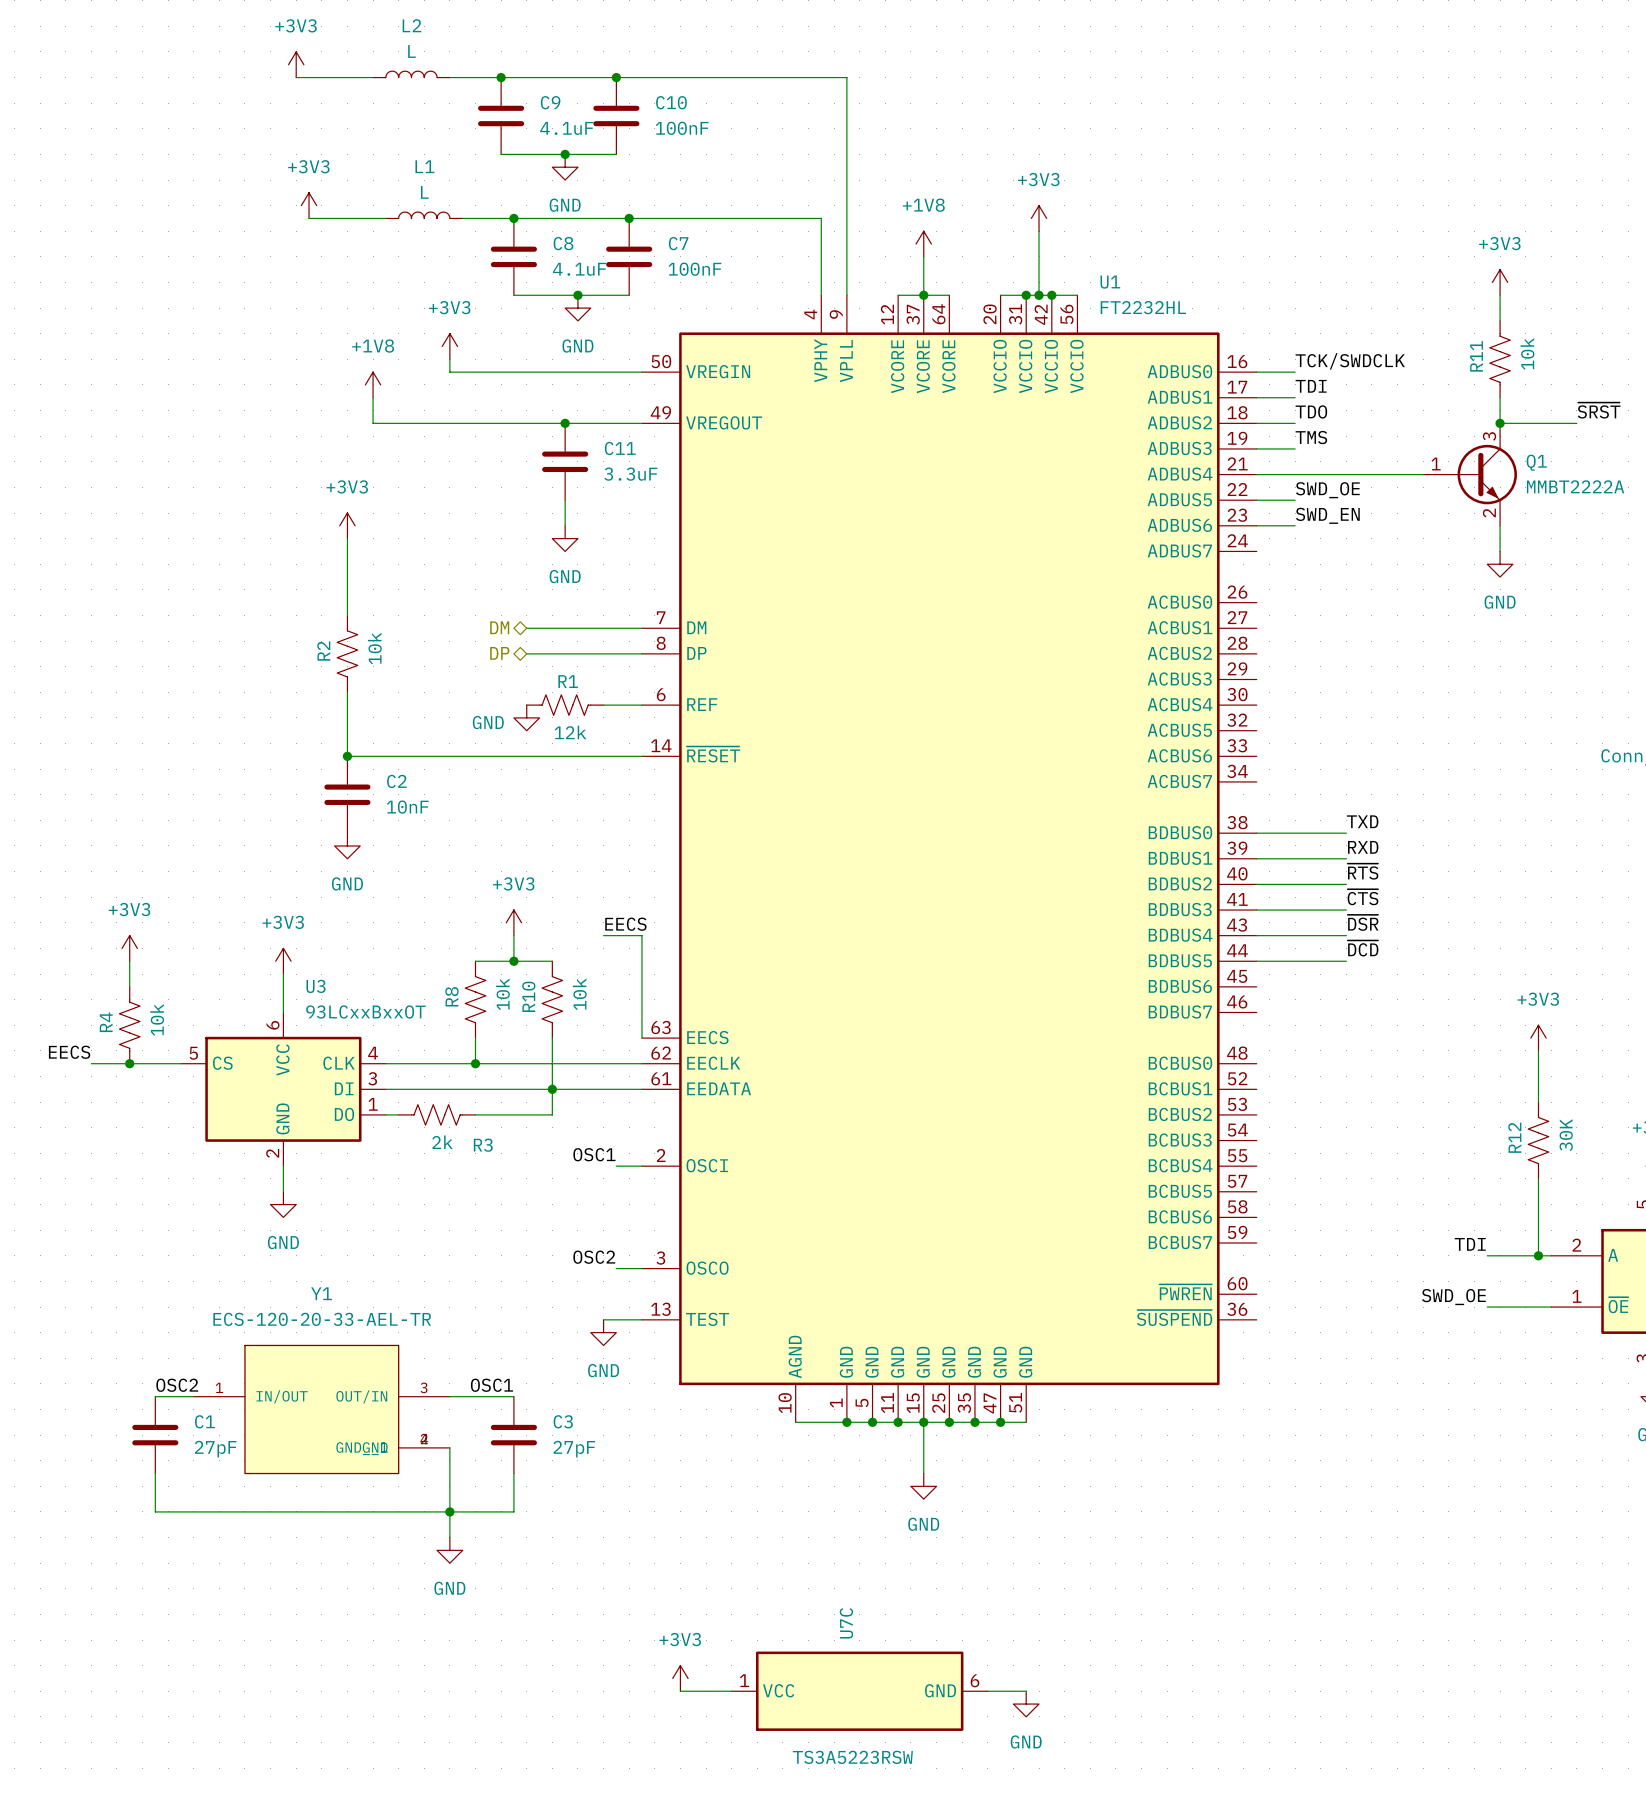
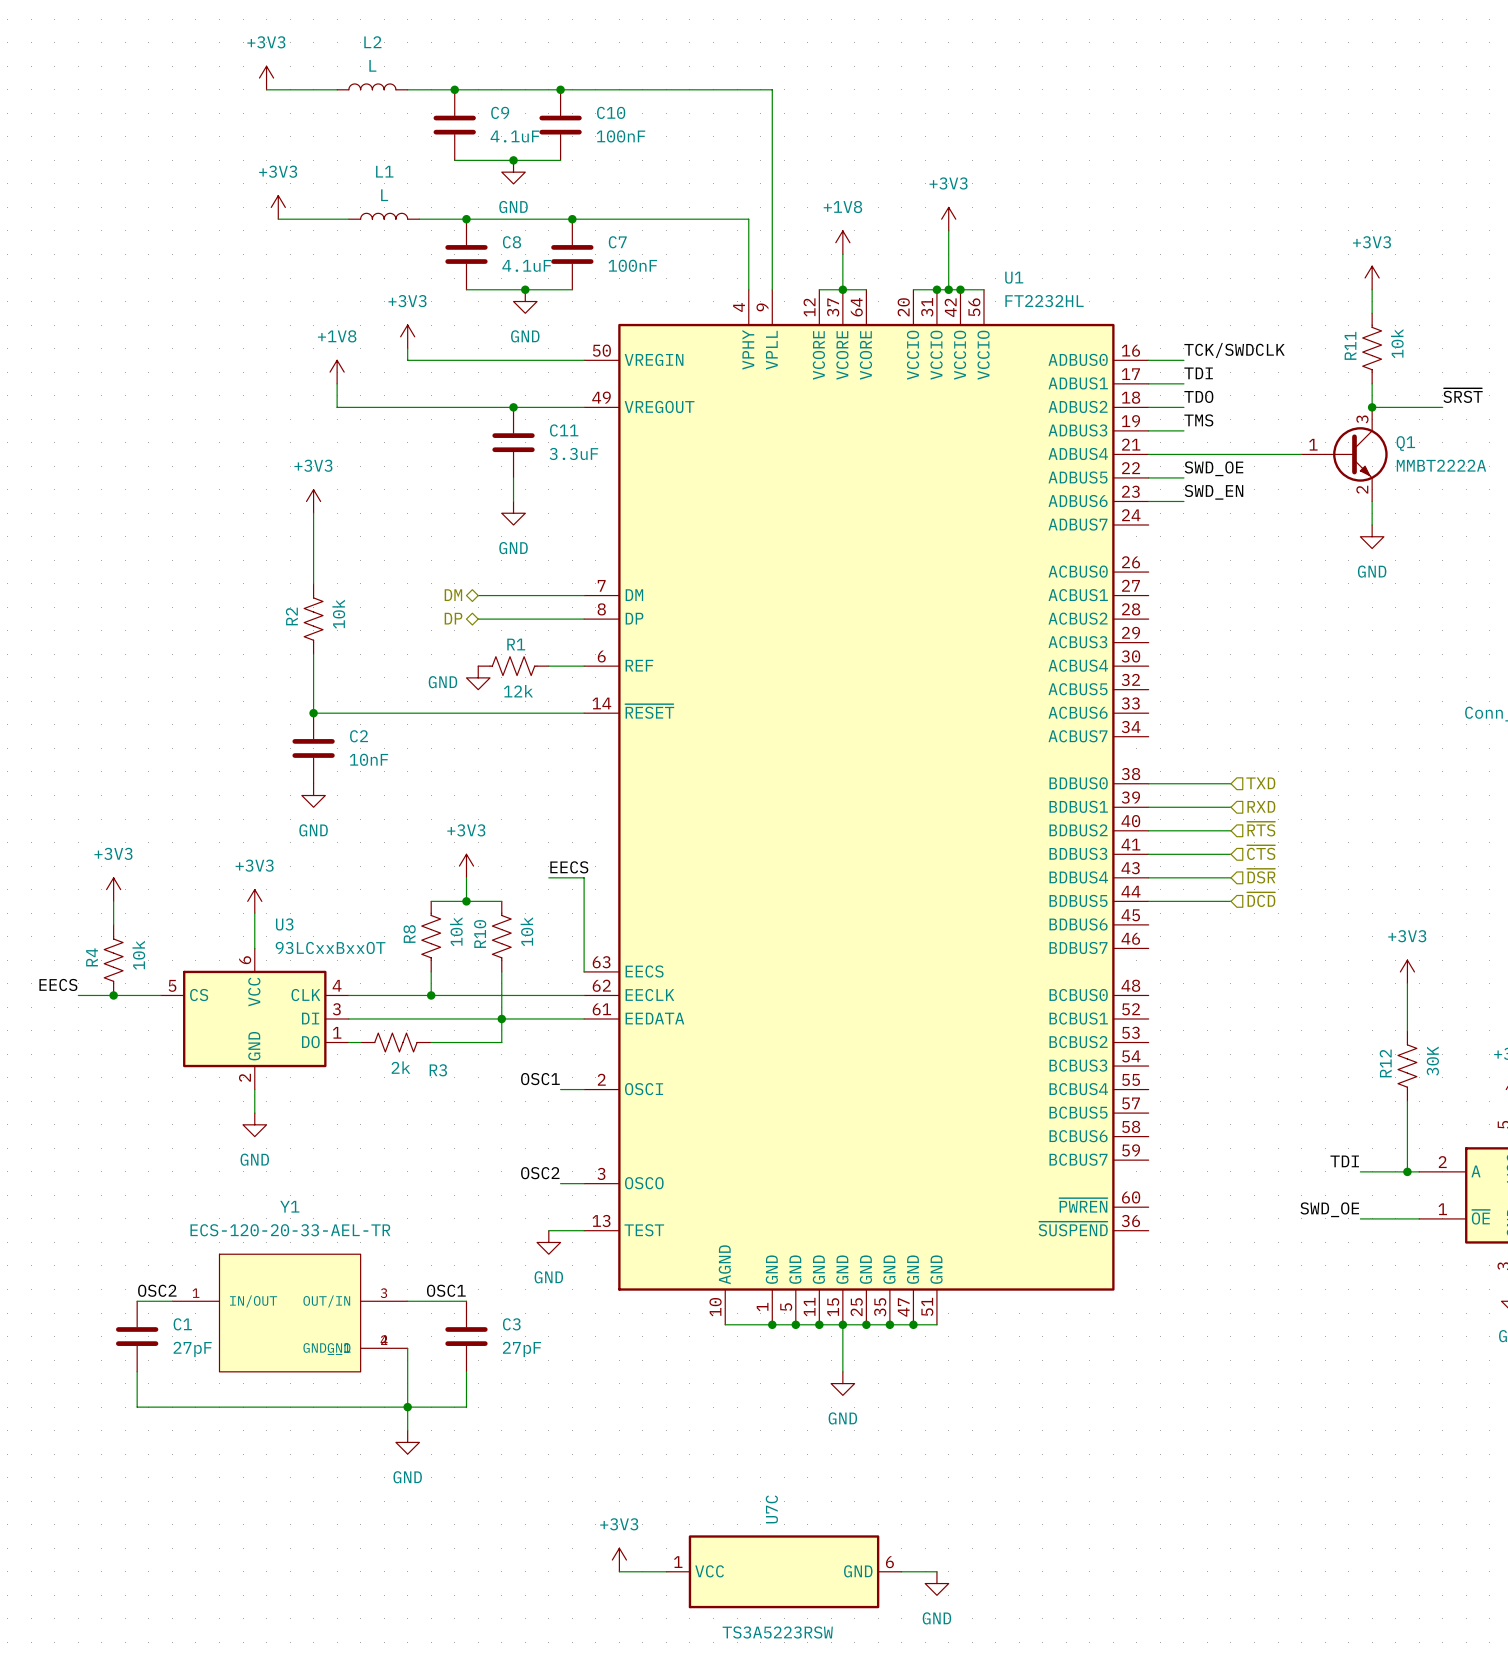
label: TXD (1362, 821) -> none
hierarchical label: none -> TXD (1260, 783)
label: RXD (1363, 847) -> none
hierarchical label: none -> RXD (1261, 806)
label: ~{RTS} (1363, 871) -> none
hierarchical label: none -> ~{RTS} (1261, 829)
label: ~{CTS} (1363, 897) -> none
hierarchical label: none -> ~{CTS} (1261, 852)
label: ~{DSR} (1363, 922) -> none
hierarchical label: none -> ~{DSR} (1261, 876)
label: ~{DCD} (1363, 948) -> none
hierarchical label: none -> ~{DCD} (1261, 899)

